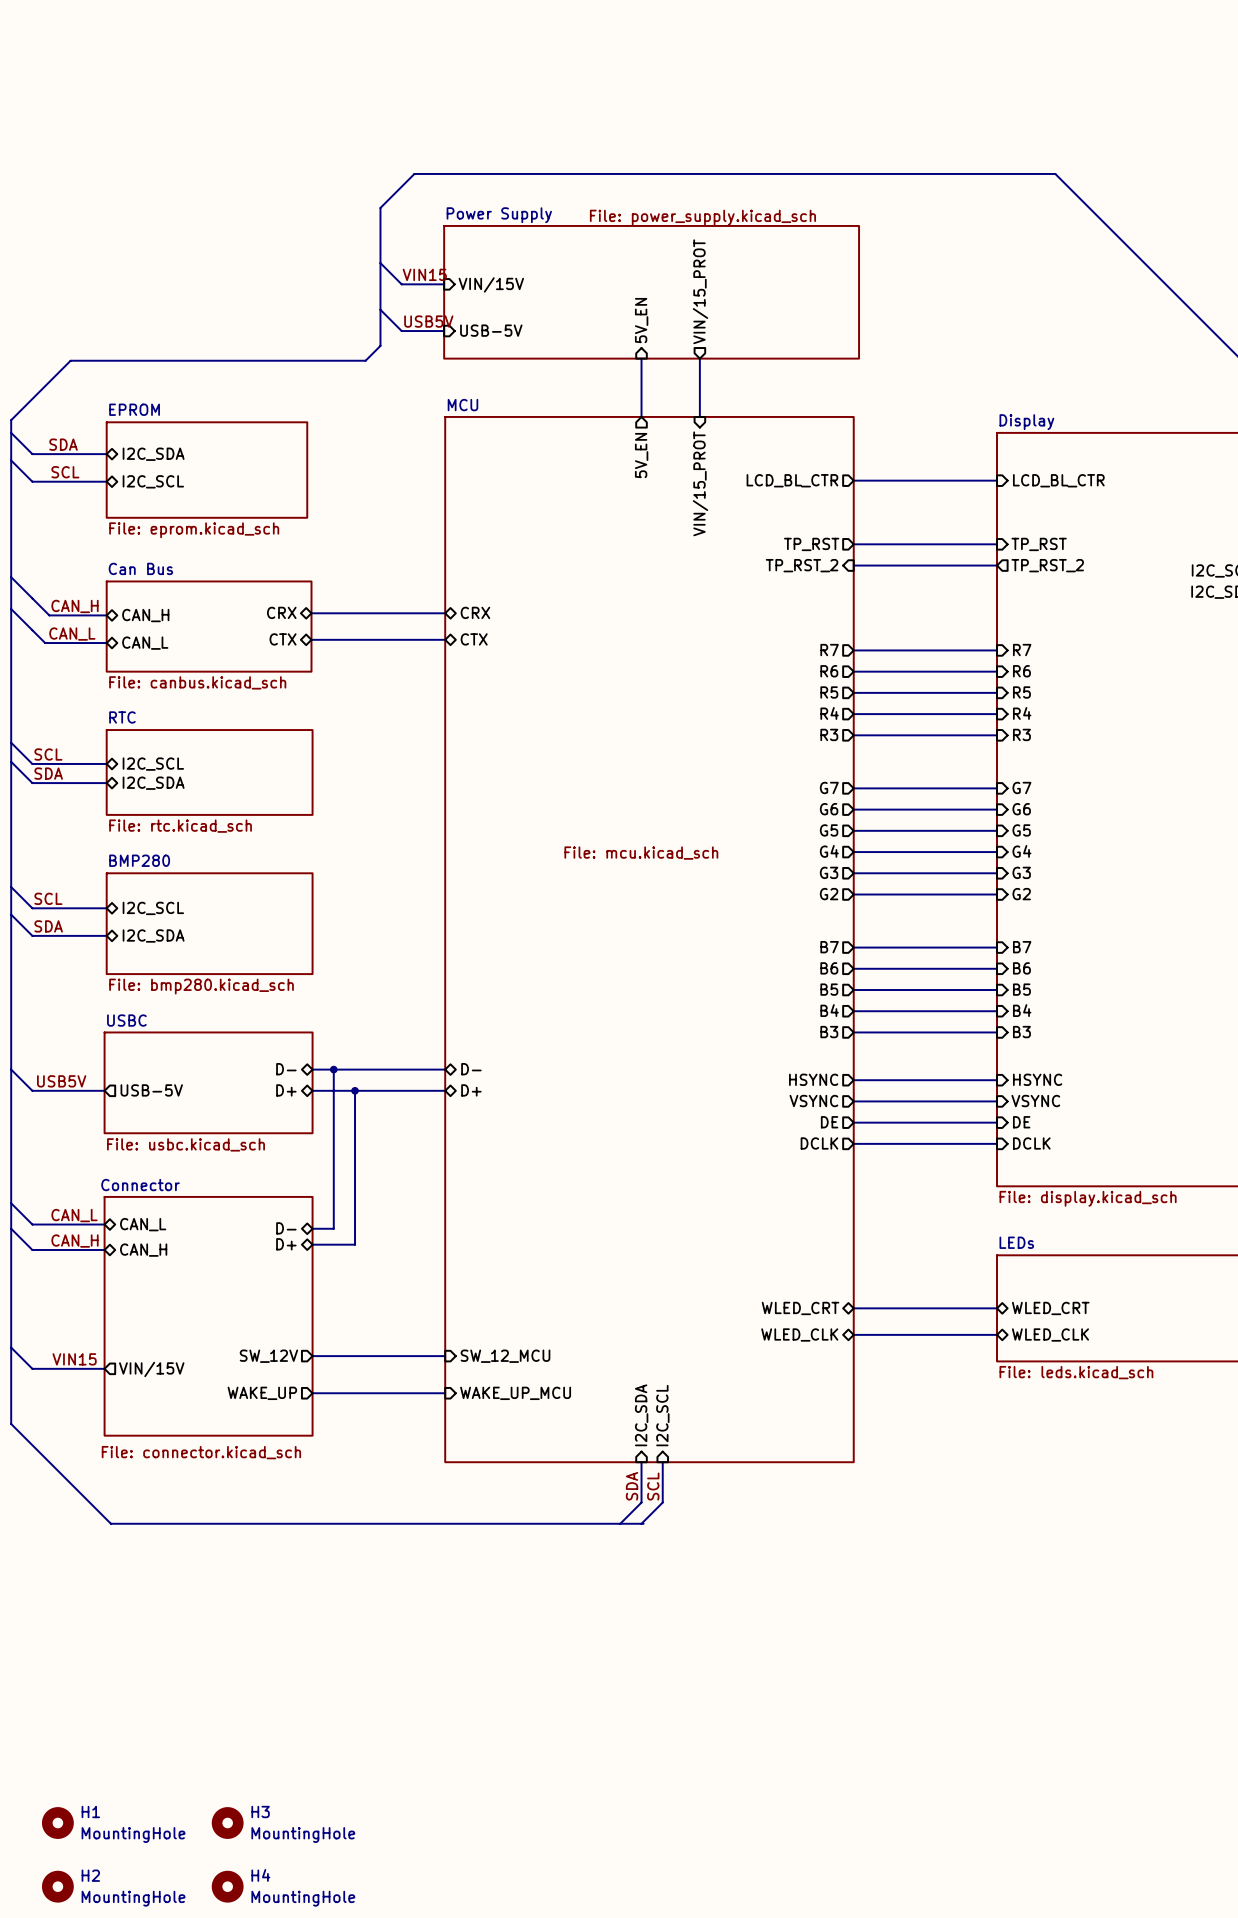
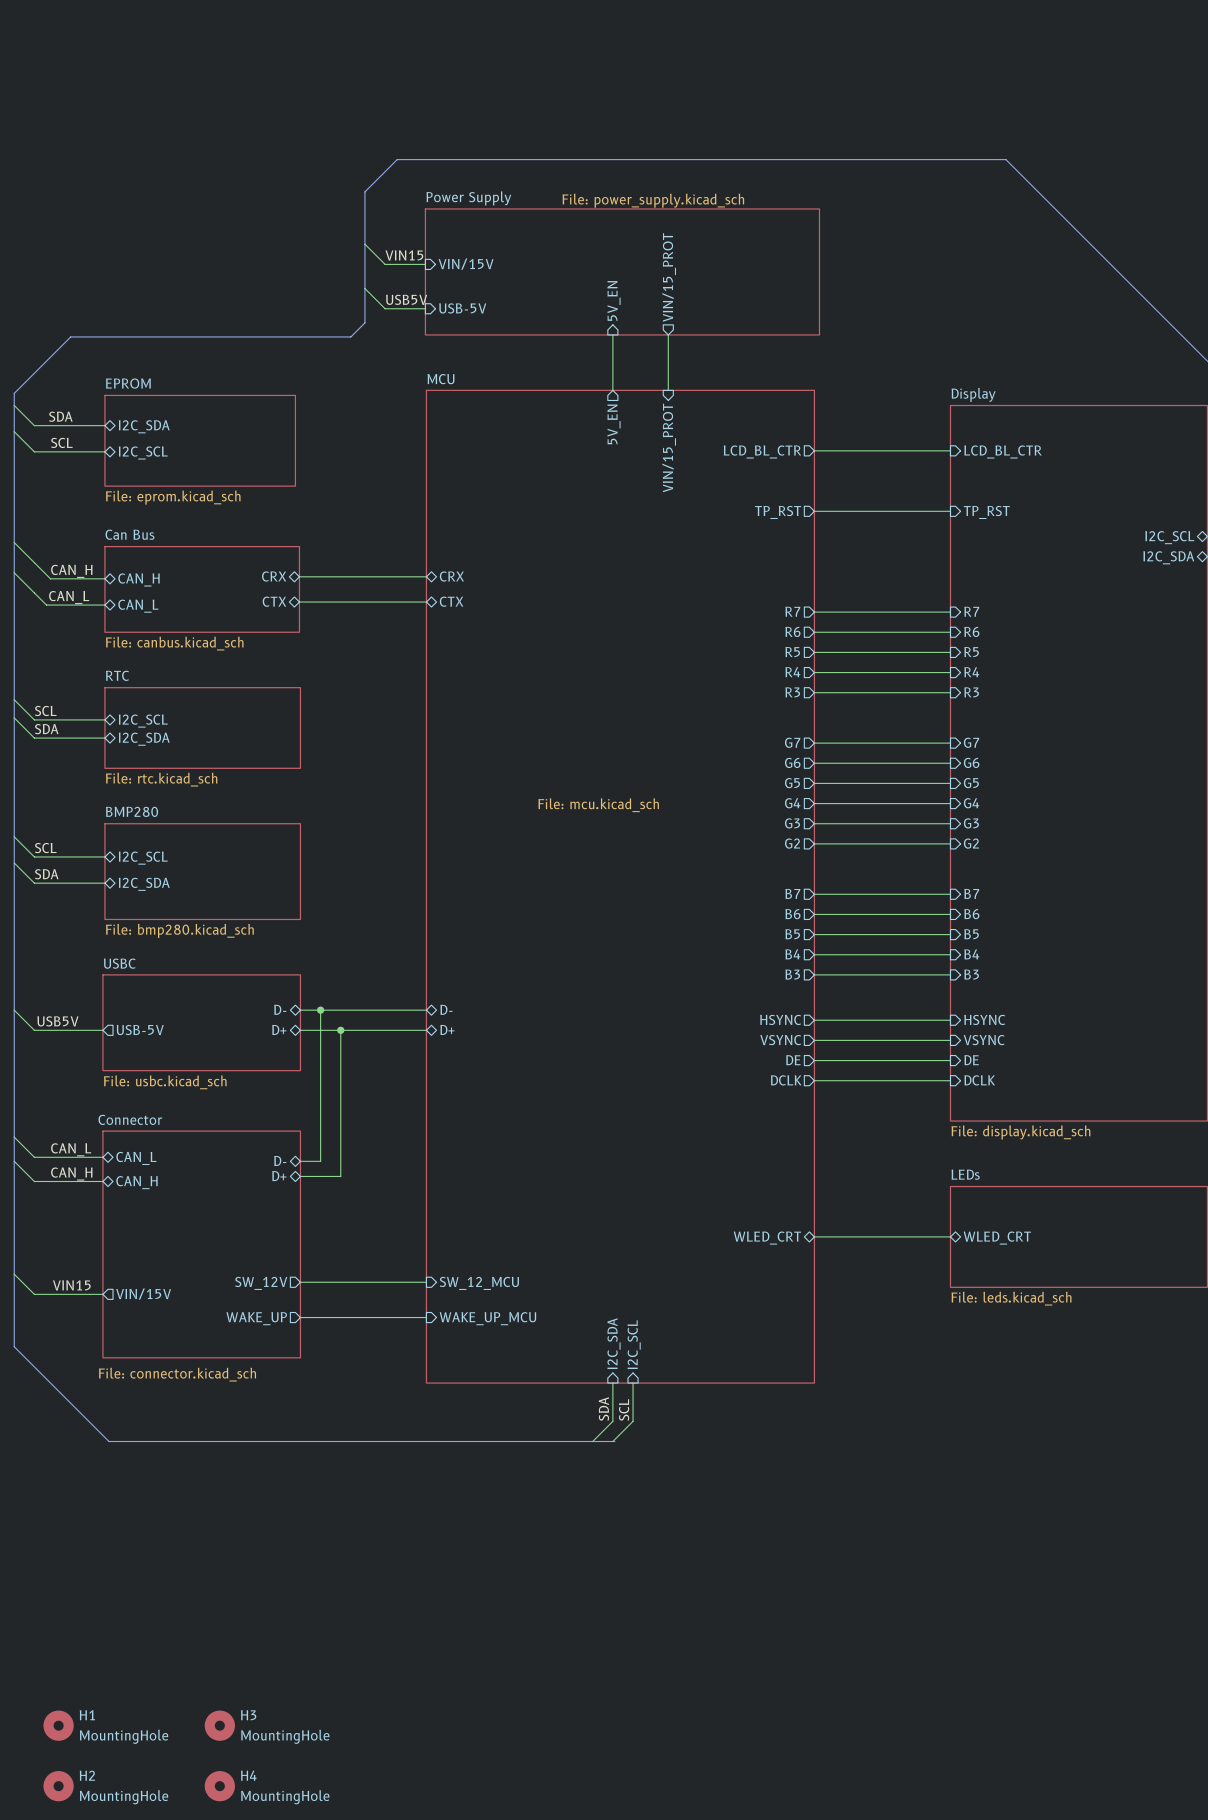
sheet pin: TP_RST_2 (802, 565) -> none
wire: (853, 565) (997, 565) -> none
sheet pin: TP_RST_2 (1047, 565) -> none
sheet pin: WLED_CLK (799, 1334) -> none
wire: (853, 1334) (997, 1334) -> none
sheet pin: WLED_CLK (1050, 1334) -> none

